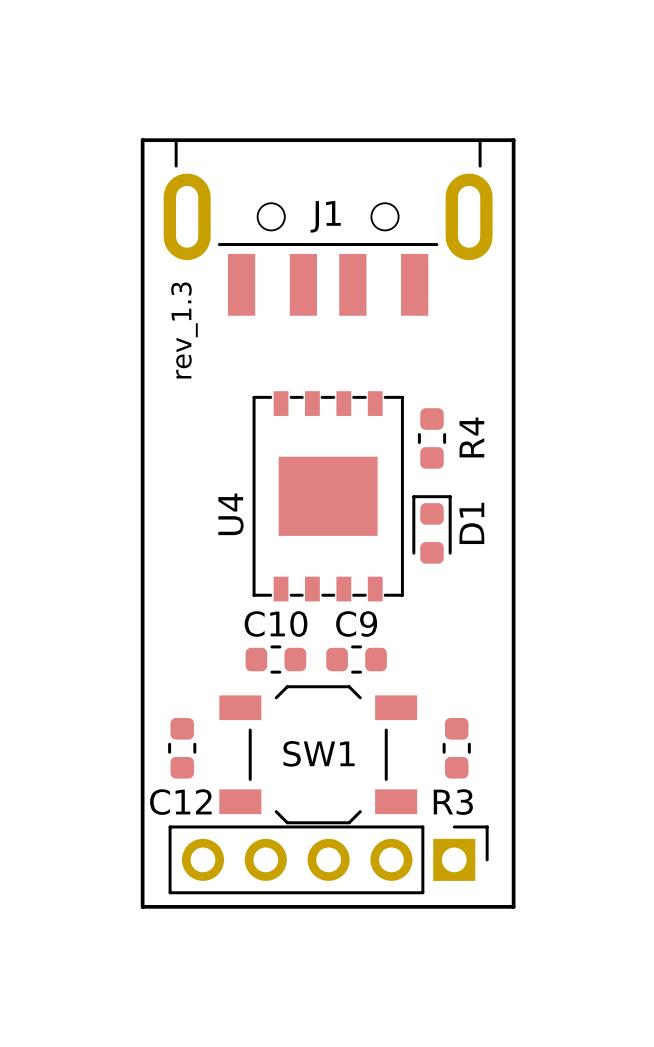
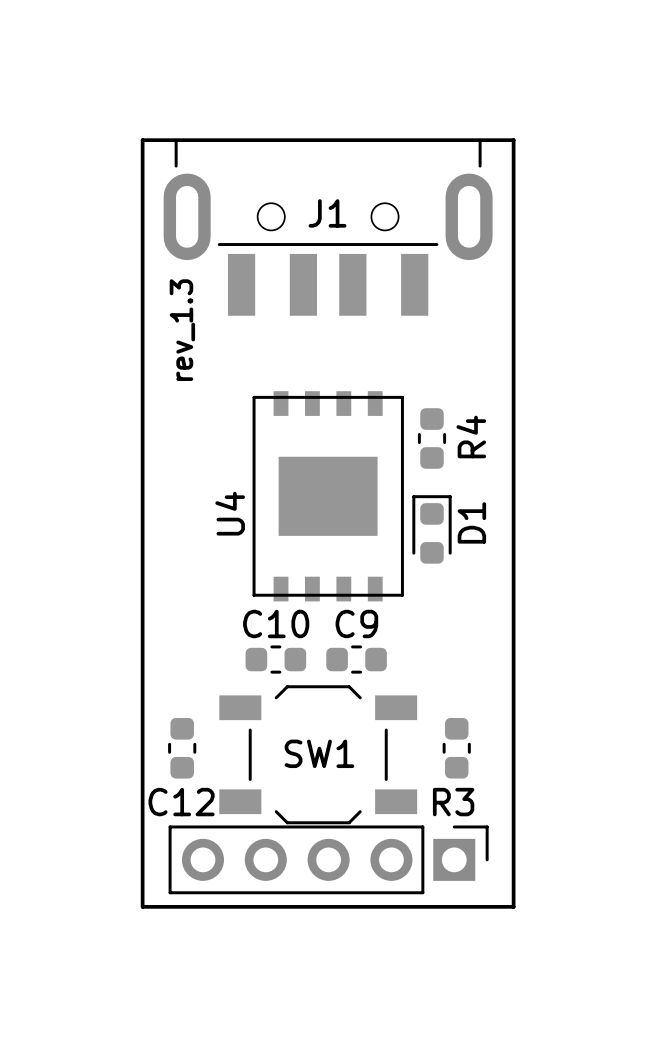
U4 footprint: [252, 391, 404, 602] -> [252, 391, 404, 602]

